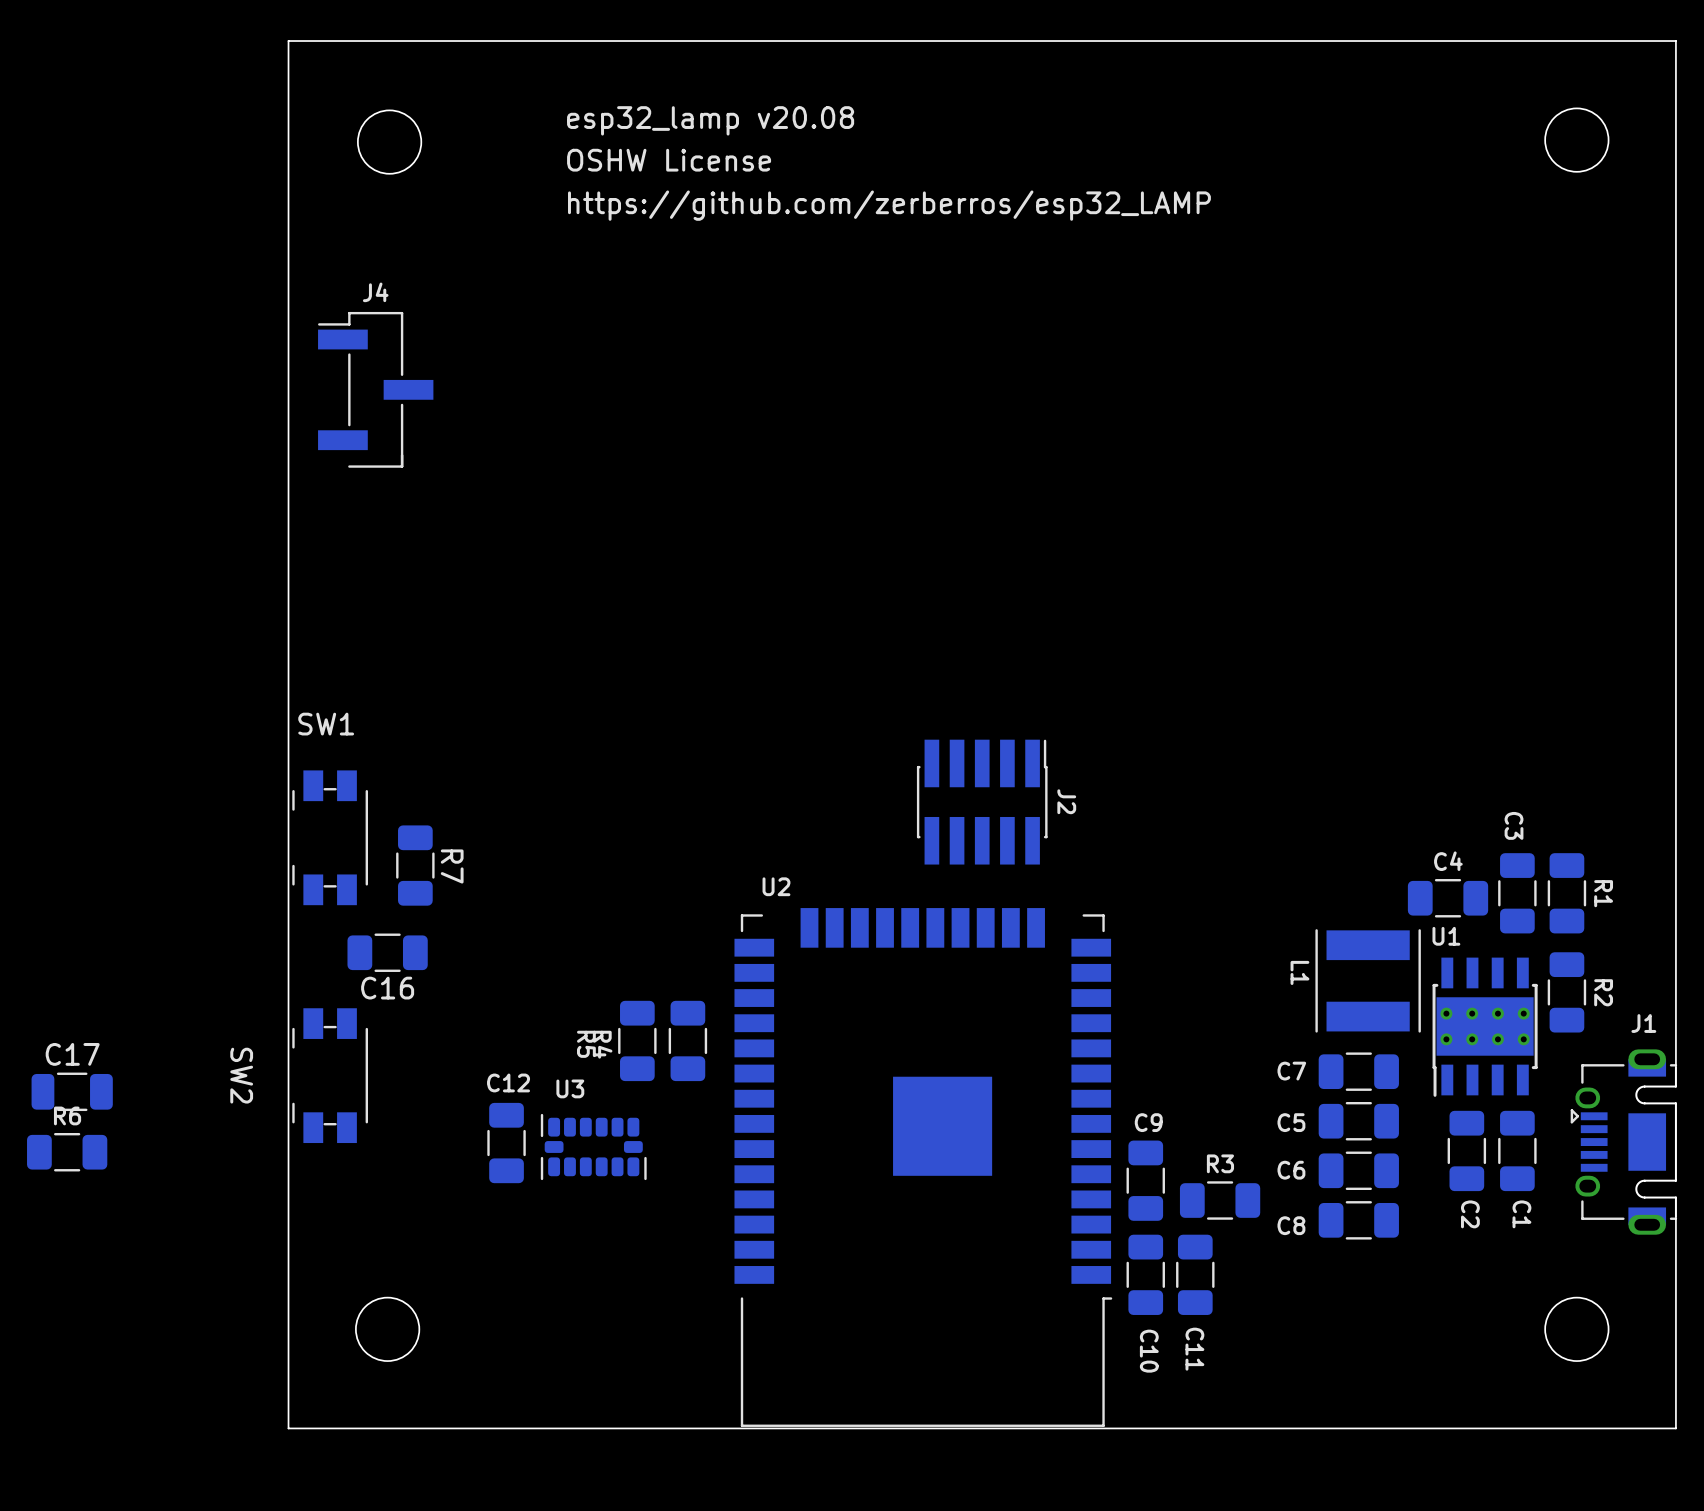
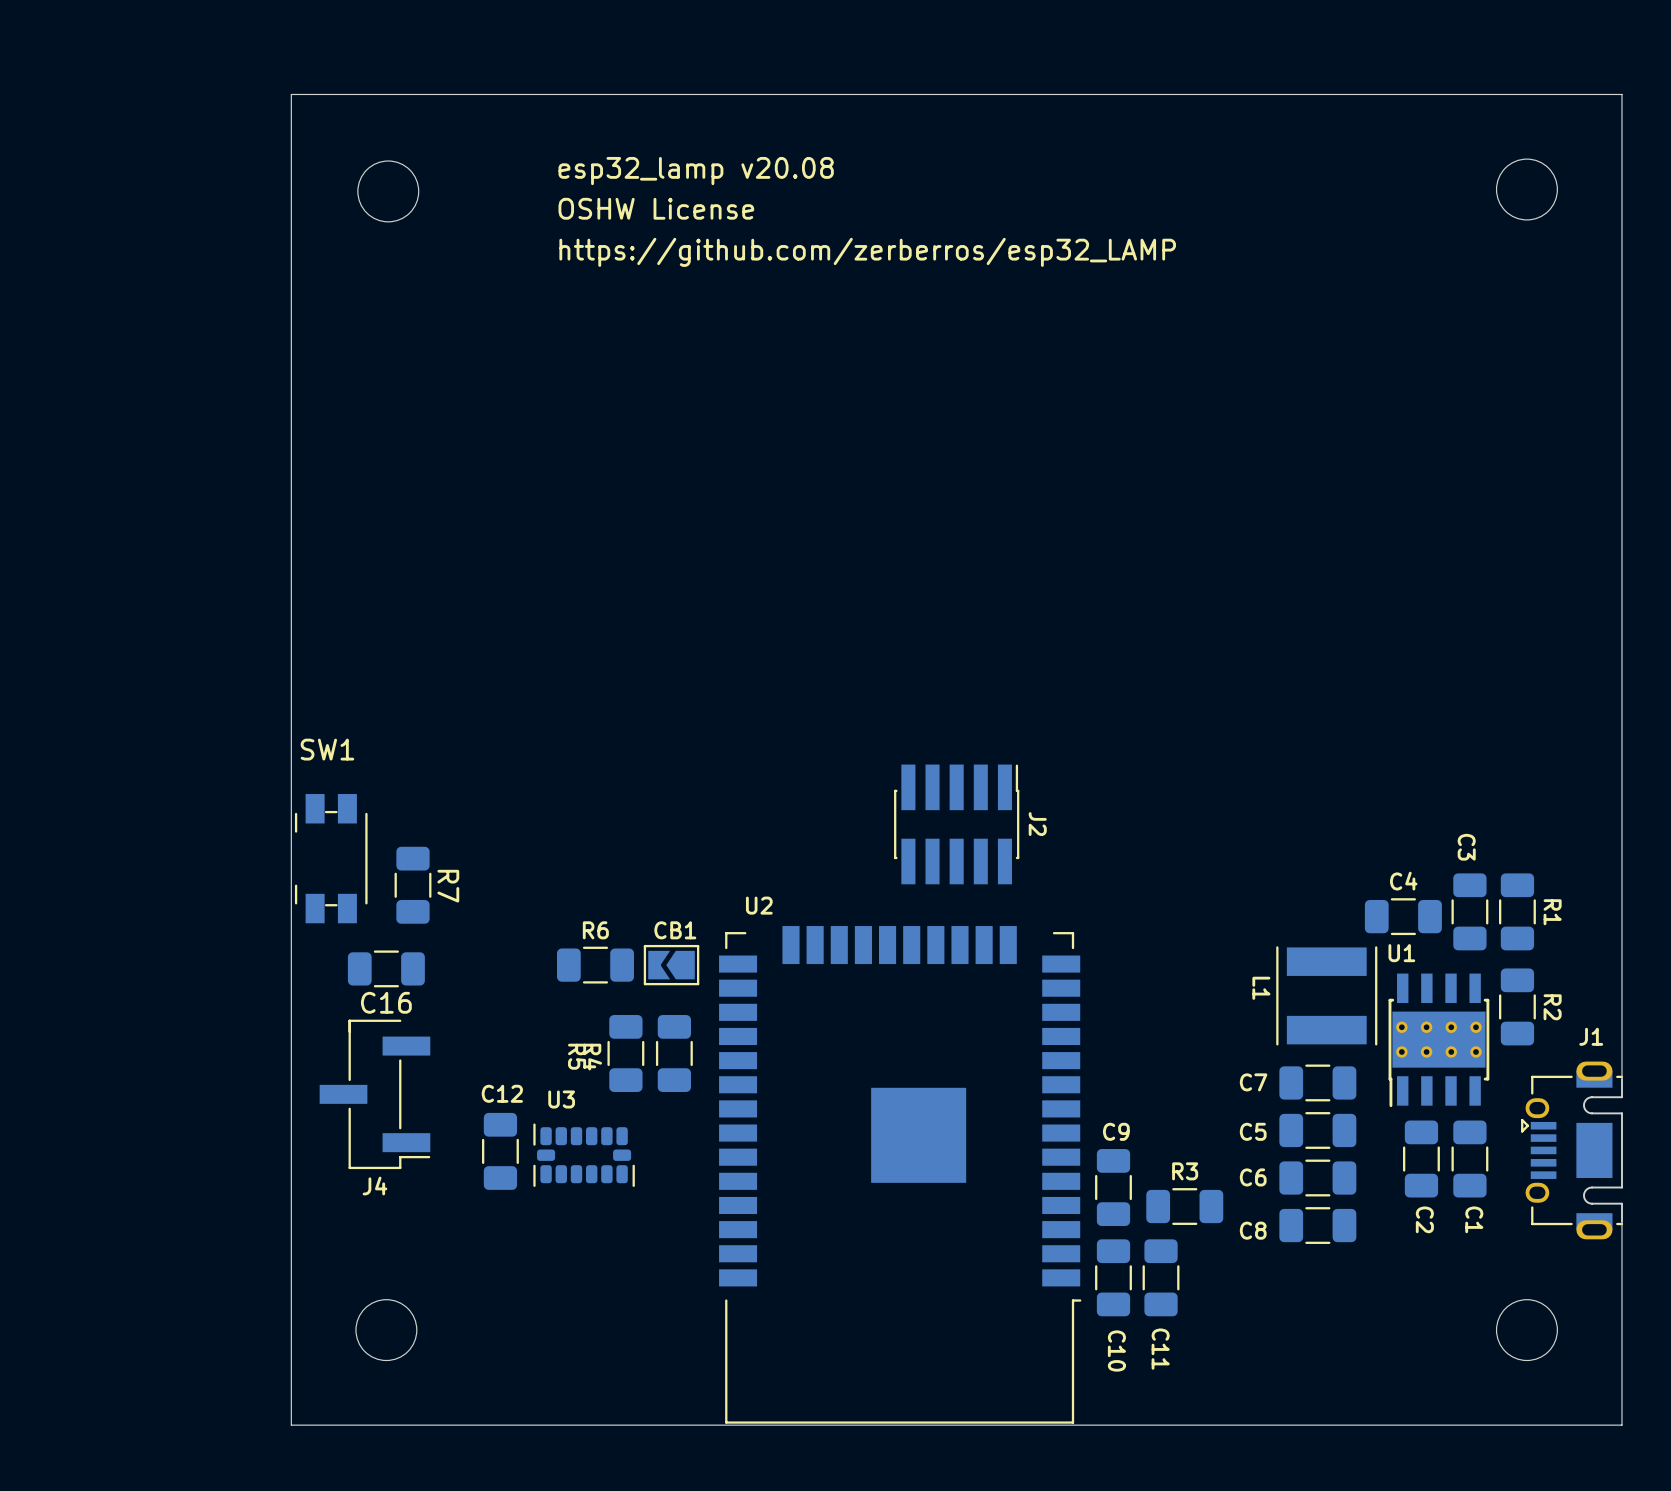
J4 rotation: 0° (375, 389) -> 180° (374, 1094)
J4 position: (375, 389) -> (374, 1094)
CB1: none -> (671, 965)
SW2: (330, 1075) -> none
C17: (72, 1091) -> none
R6 position: (67, 1152) -> (595, 965)

